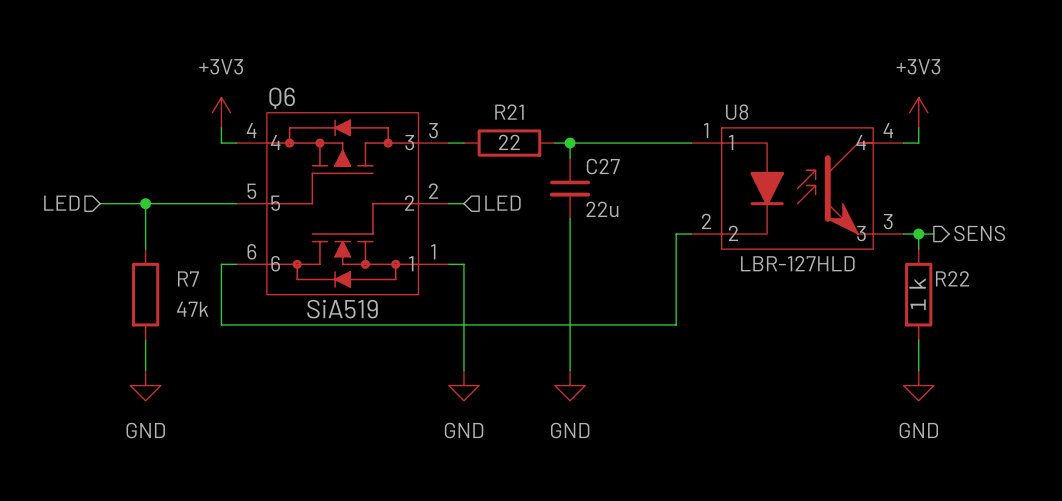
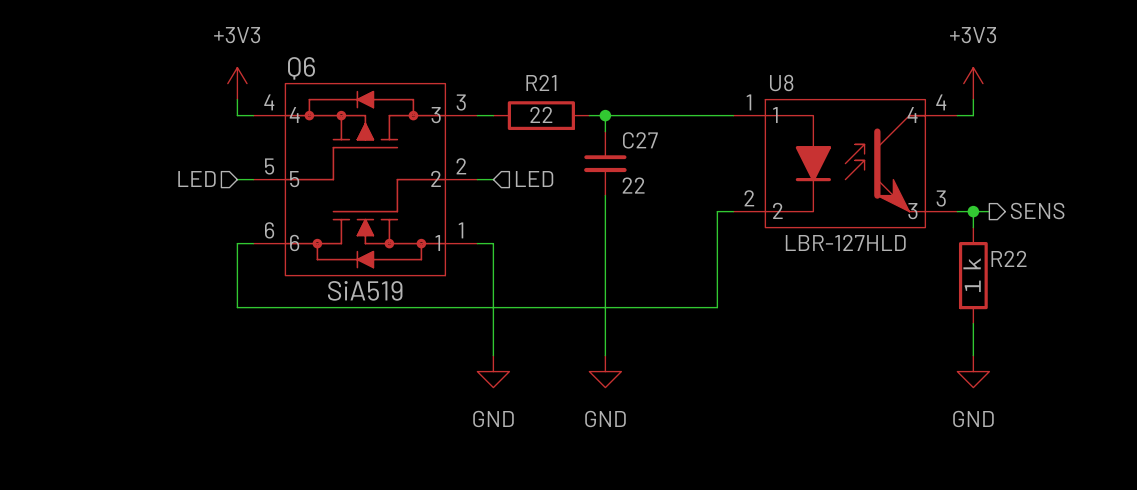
hierarchical label position: LED (61, 203) -> LED (196, 179)
wire: (100, 203) (221, 203) -> none
wire: (145, 203) (145, 249) -> none
junction: (145, 203) -> none
C27 value: 22u (602, 209) -> 22 (633, 185)
R7: 47k (145, 294) -> none
wire: (145, 340) (145, 370) -> none
power symbol: GND (145, 385) -> none

